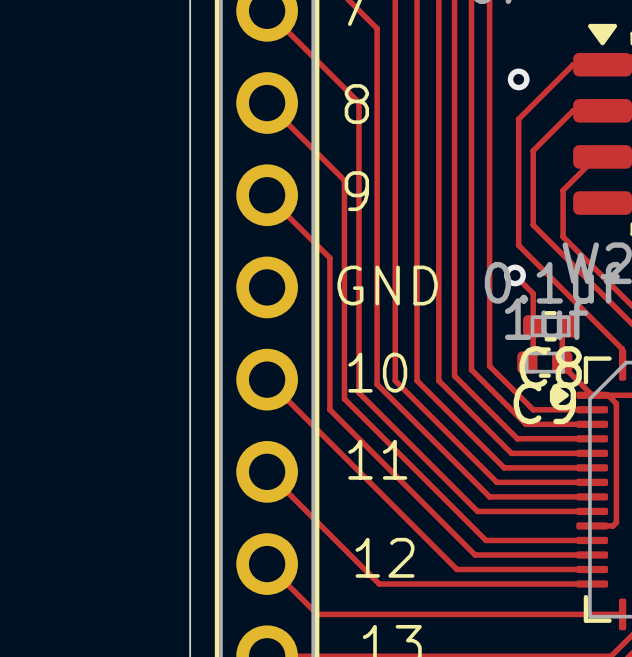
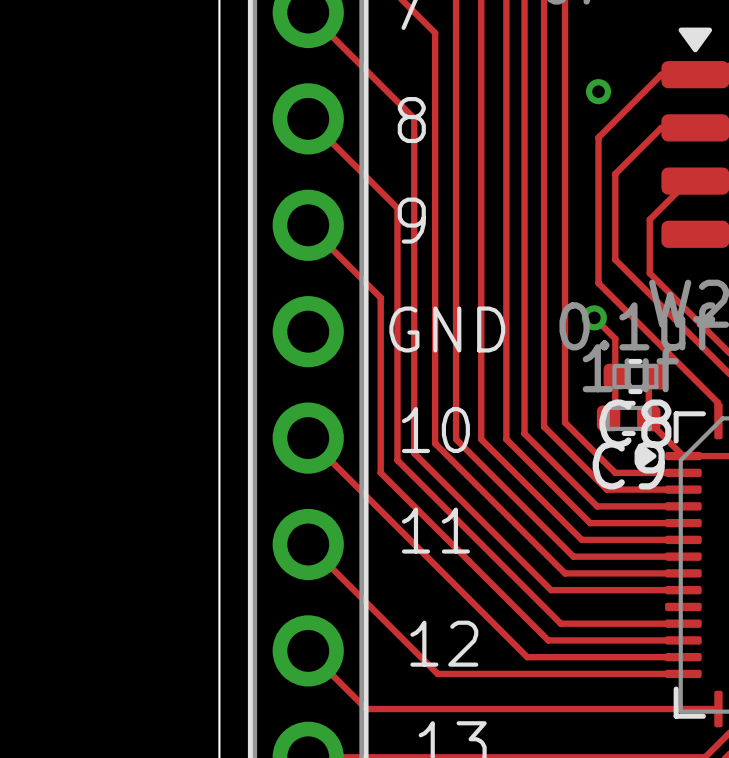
track: (608, 395) (616, 403) (616, 522) (613, 525) (592, 525) -> none

